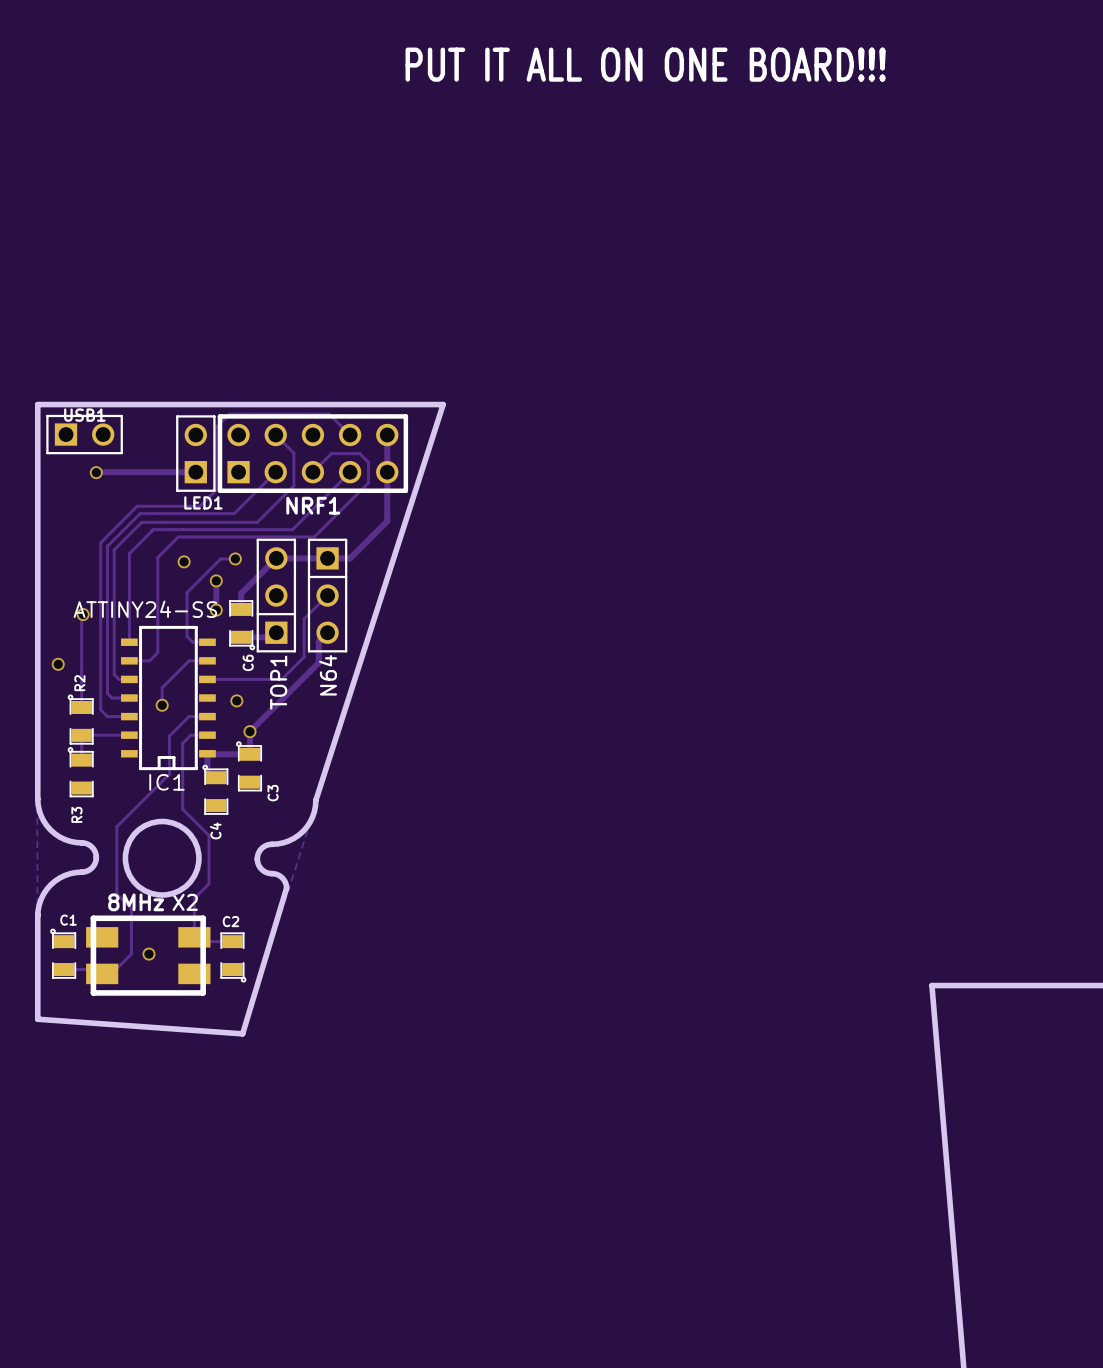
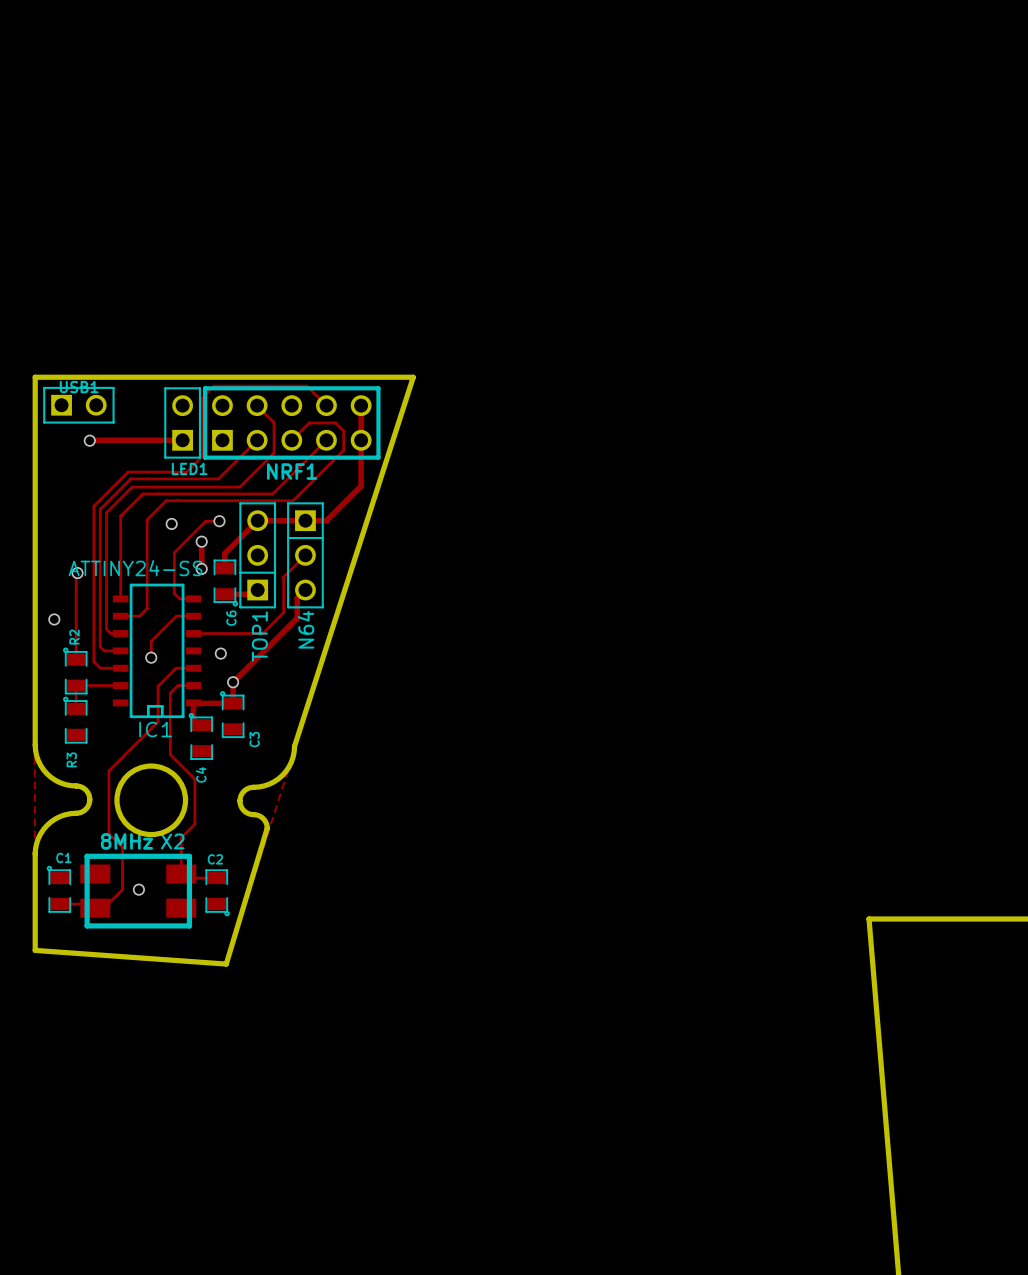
text: PUT IT ALL ON ONE BOARD!!! (645, 64) -> none

